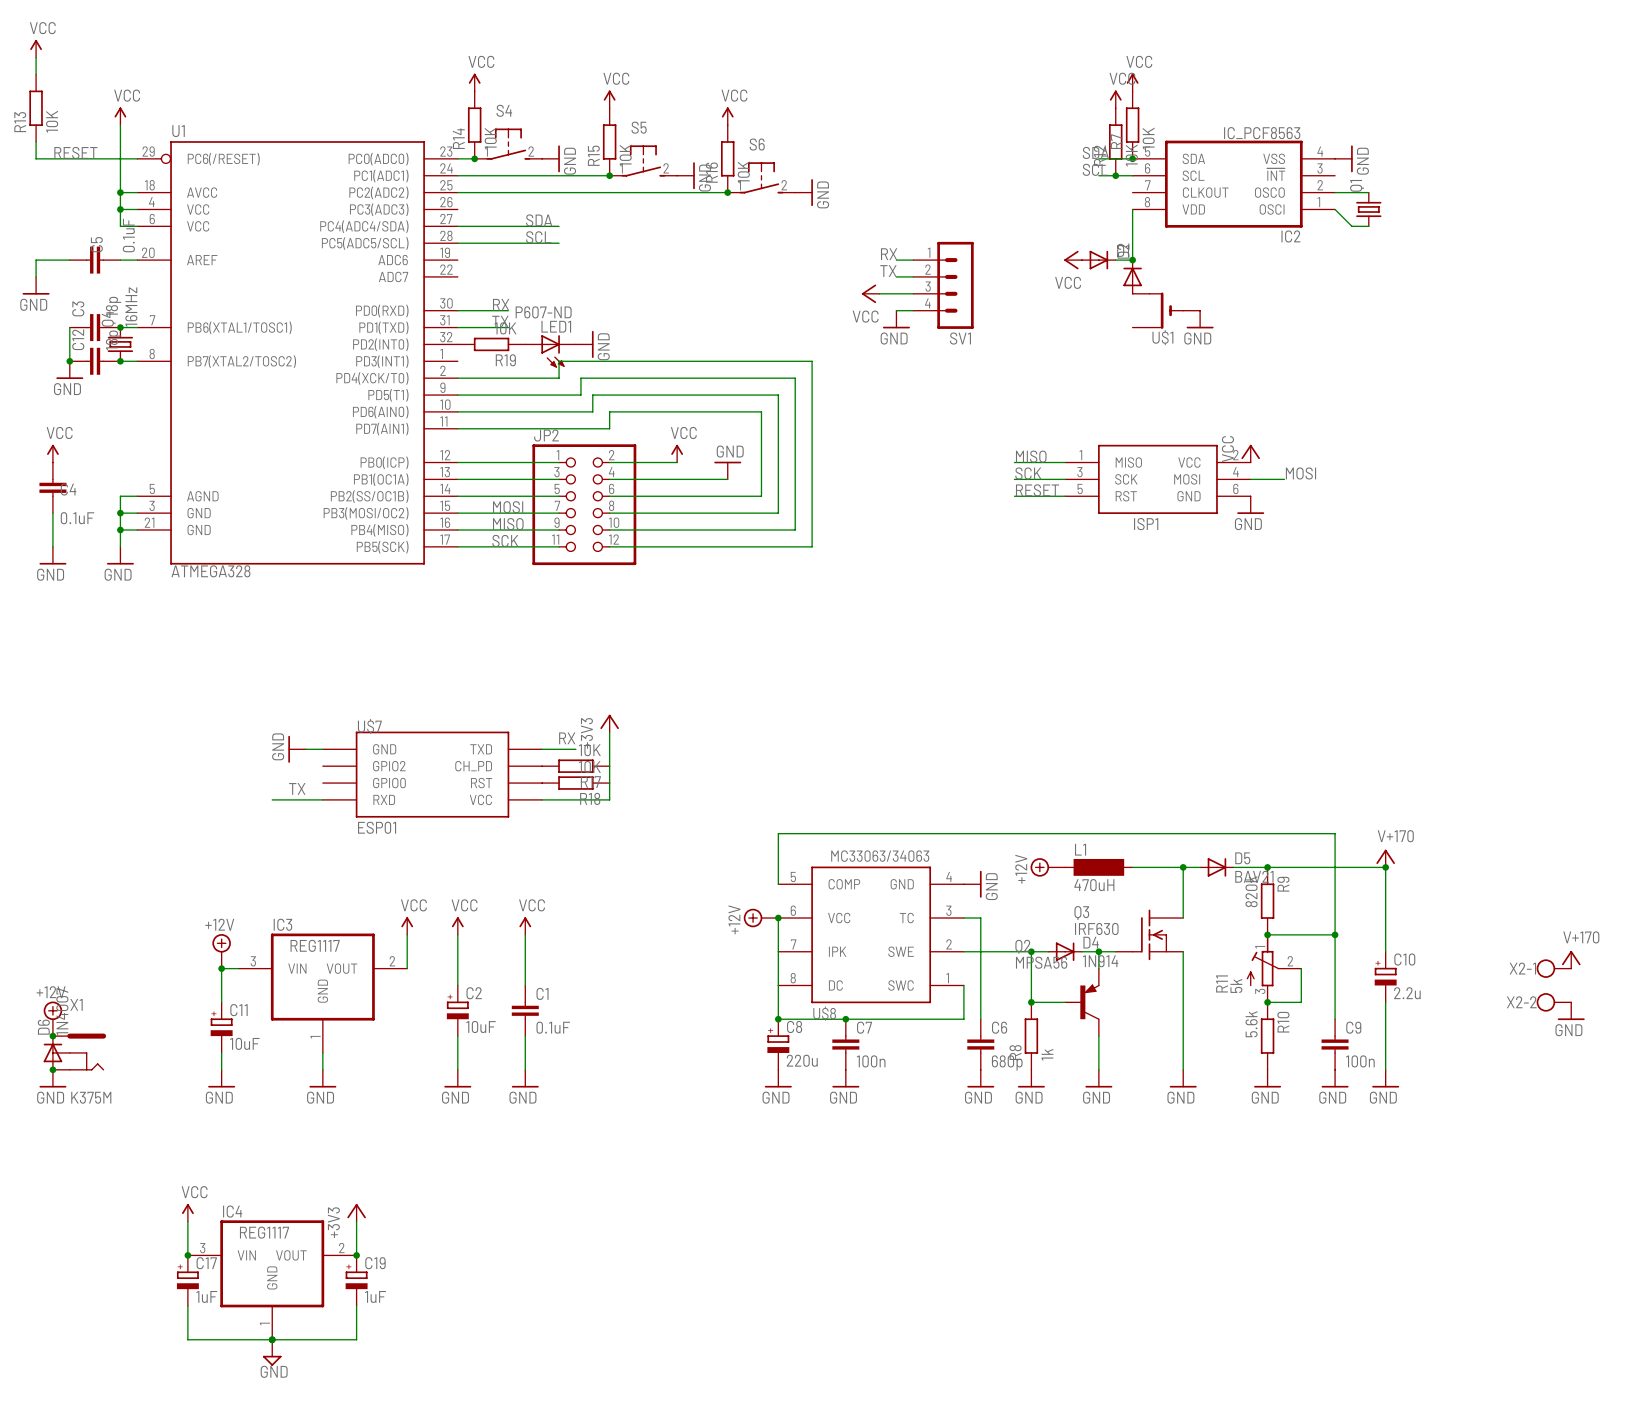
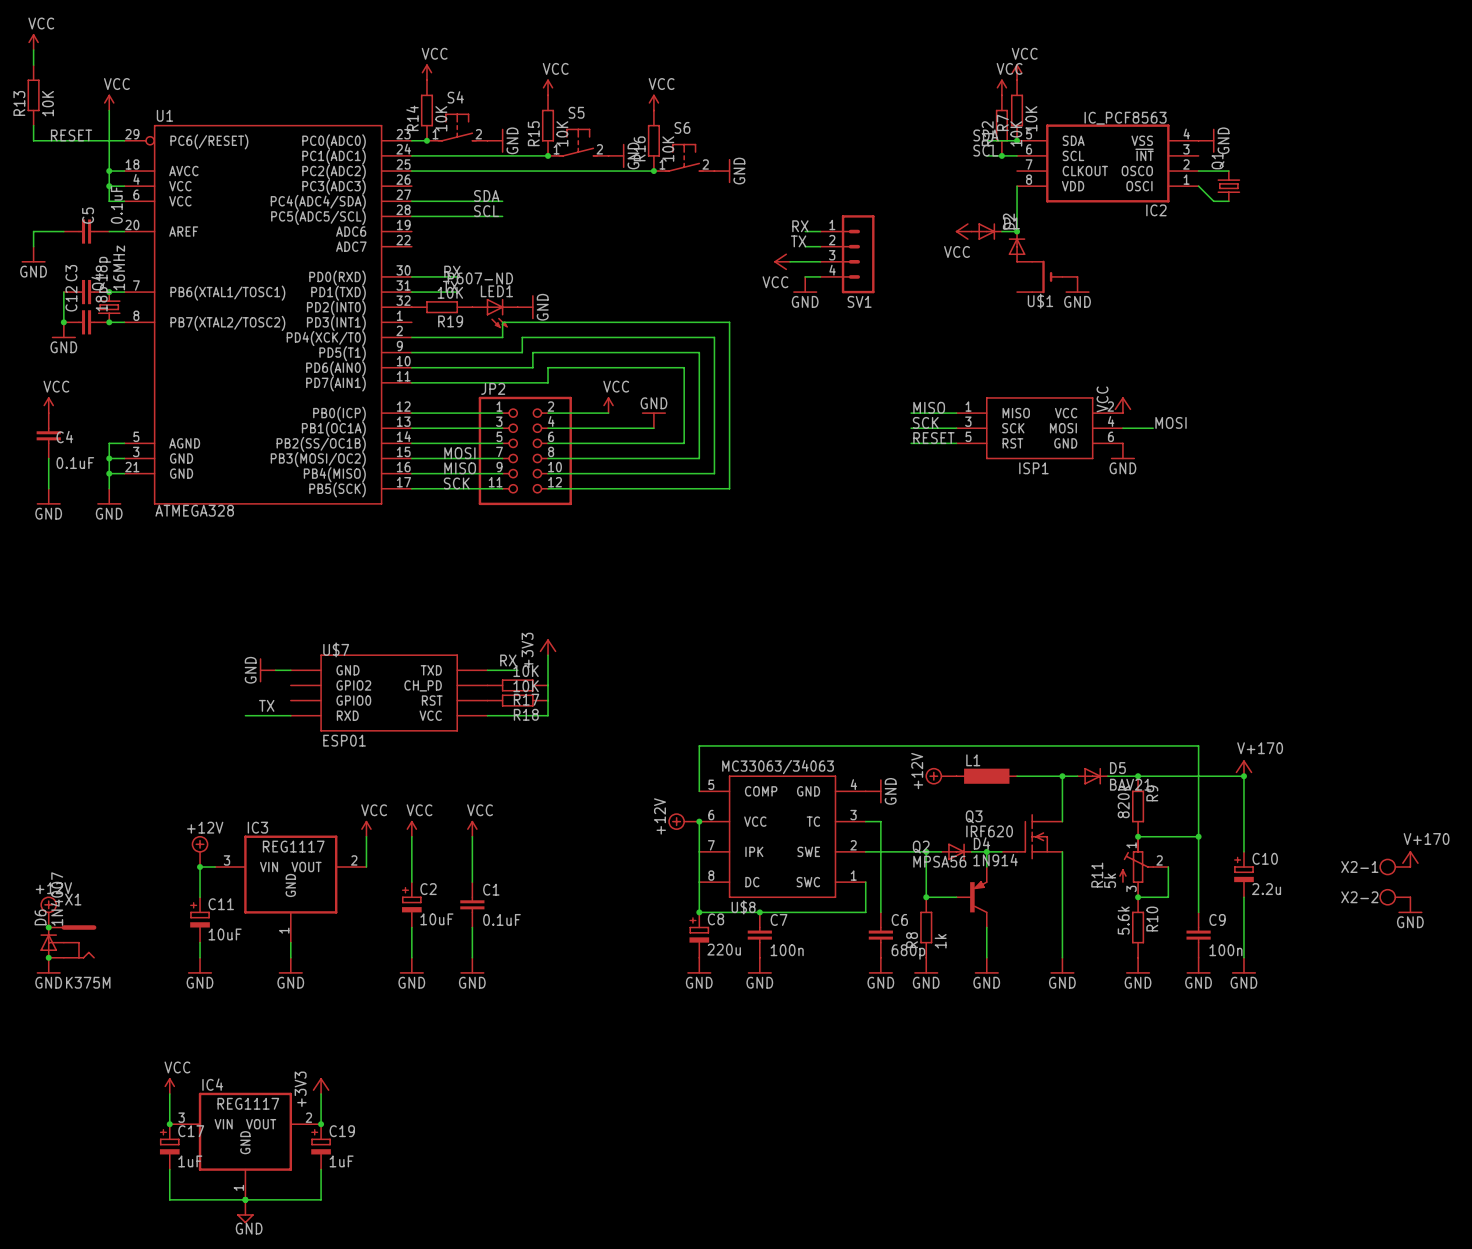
L1 value: 470uH (1094, 885) -> none
Q3 value: IRF630 (1096, 928) -> IRF620 (989, 831)

